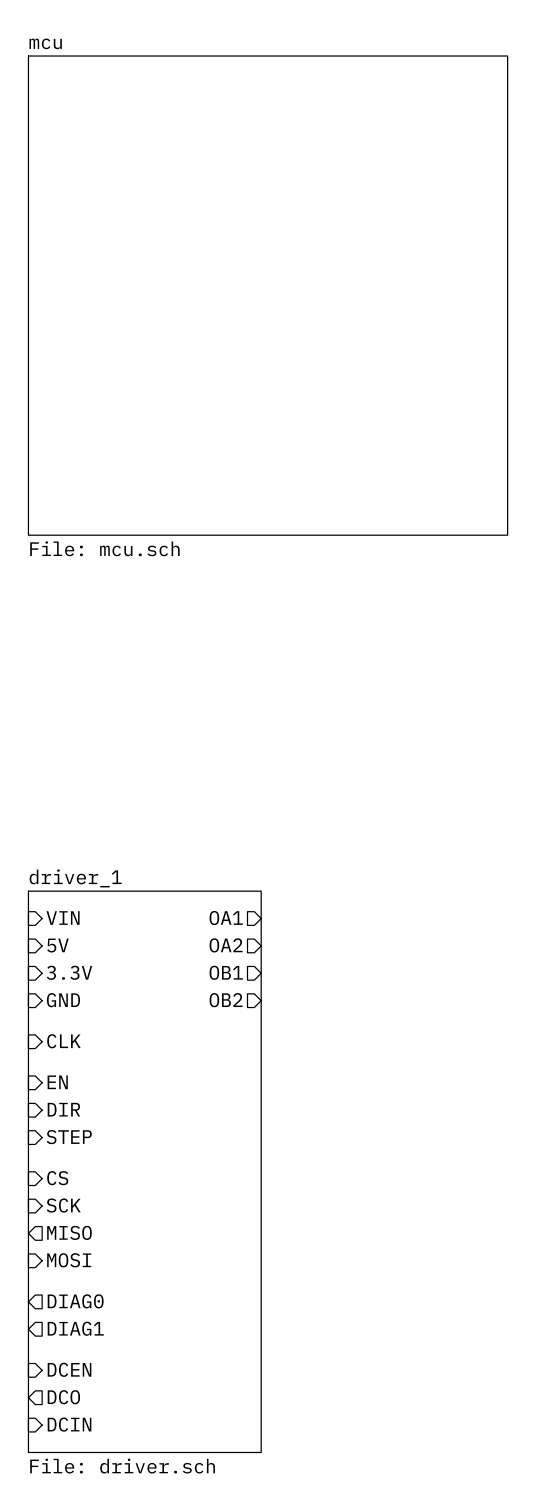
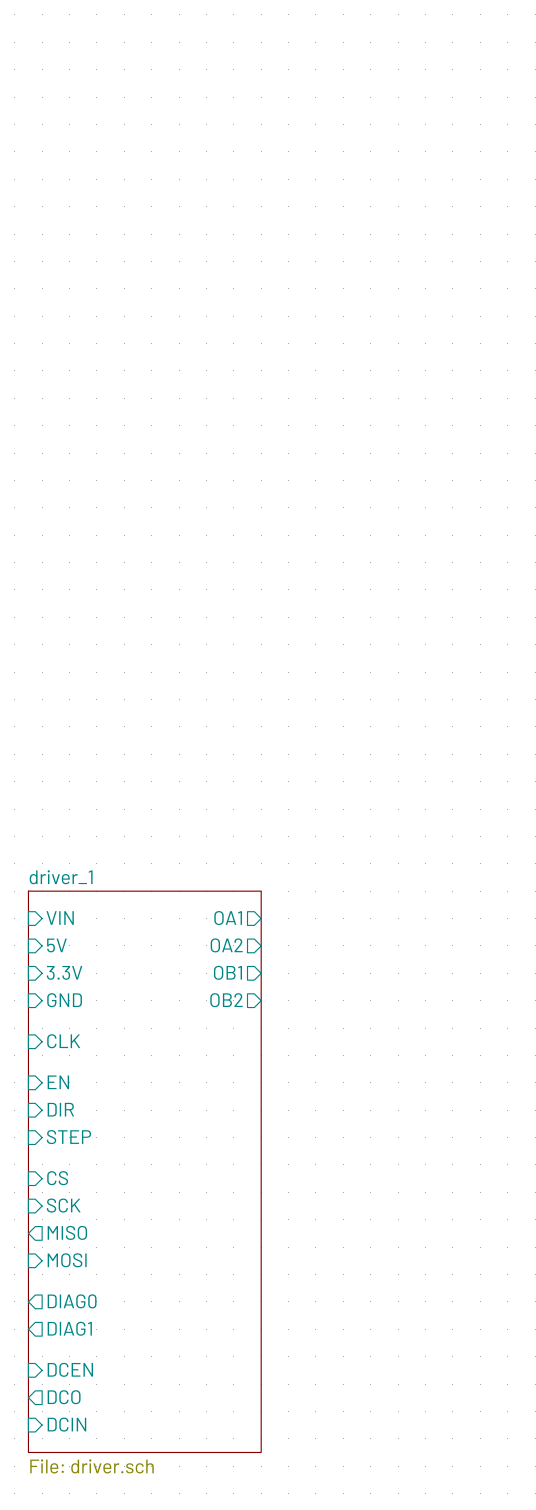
sheet mcu: File: mcu.sch (268, 295) -> none

